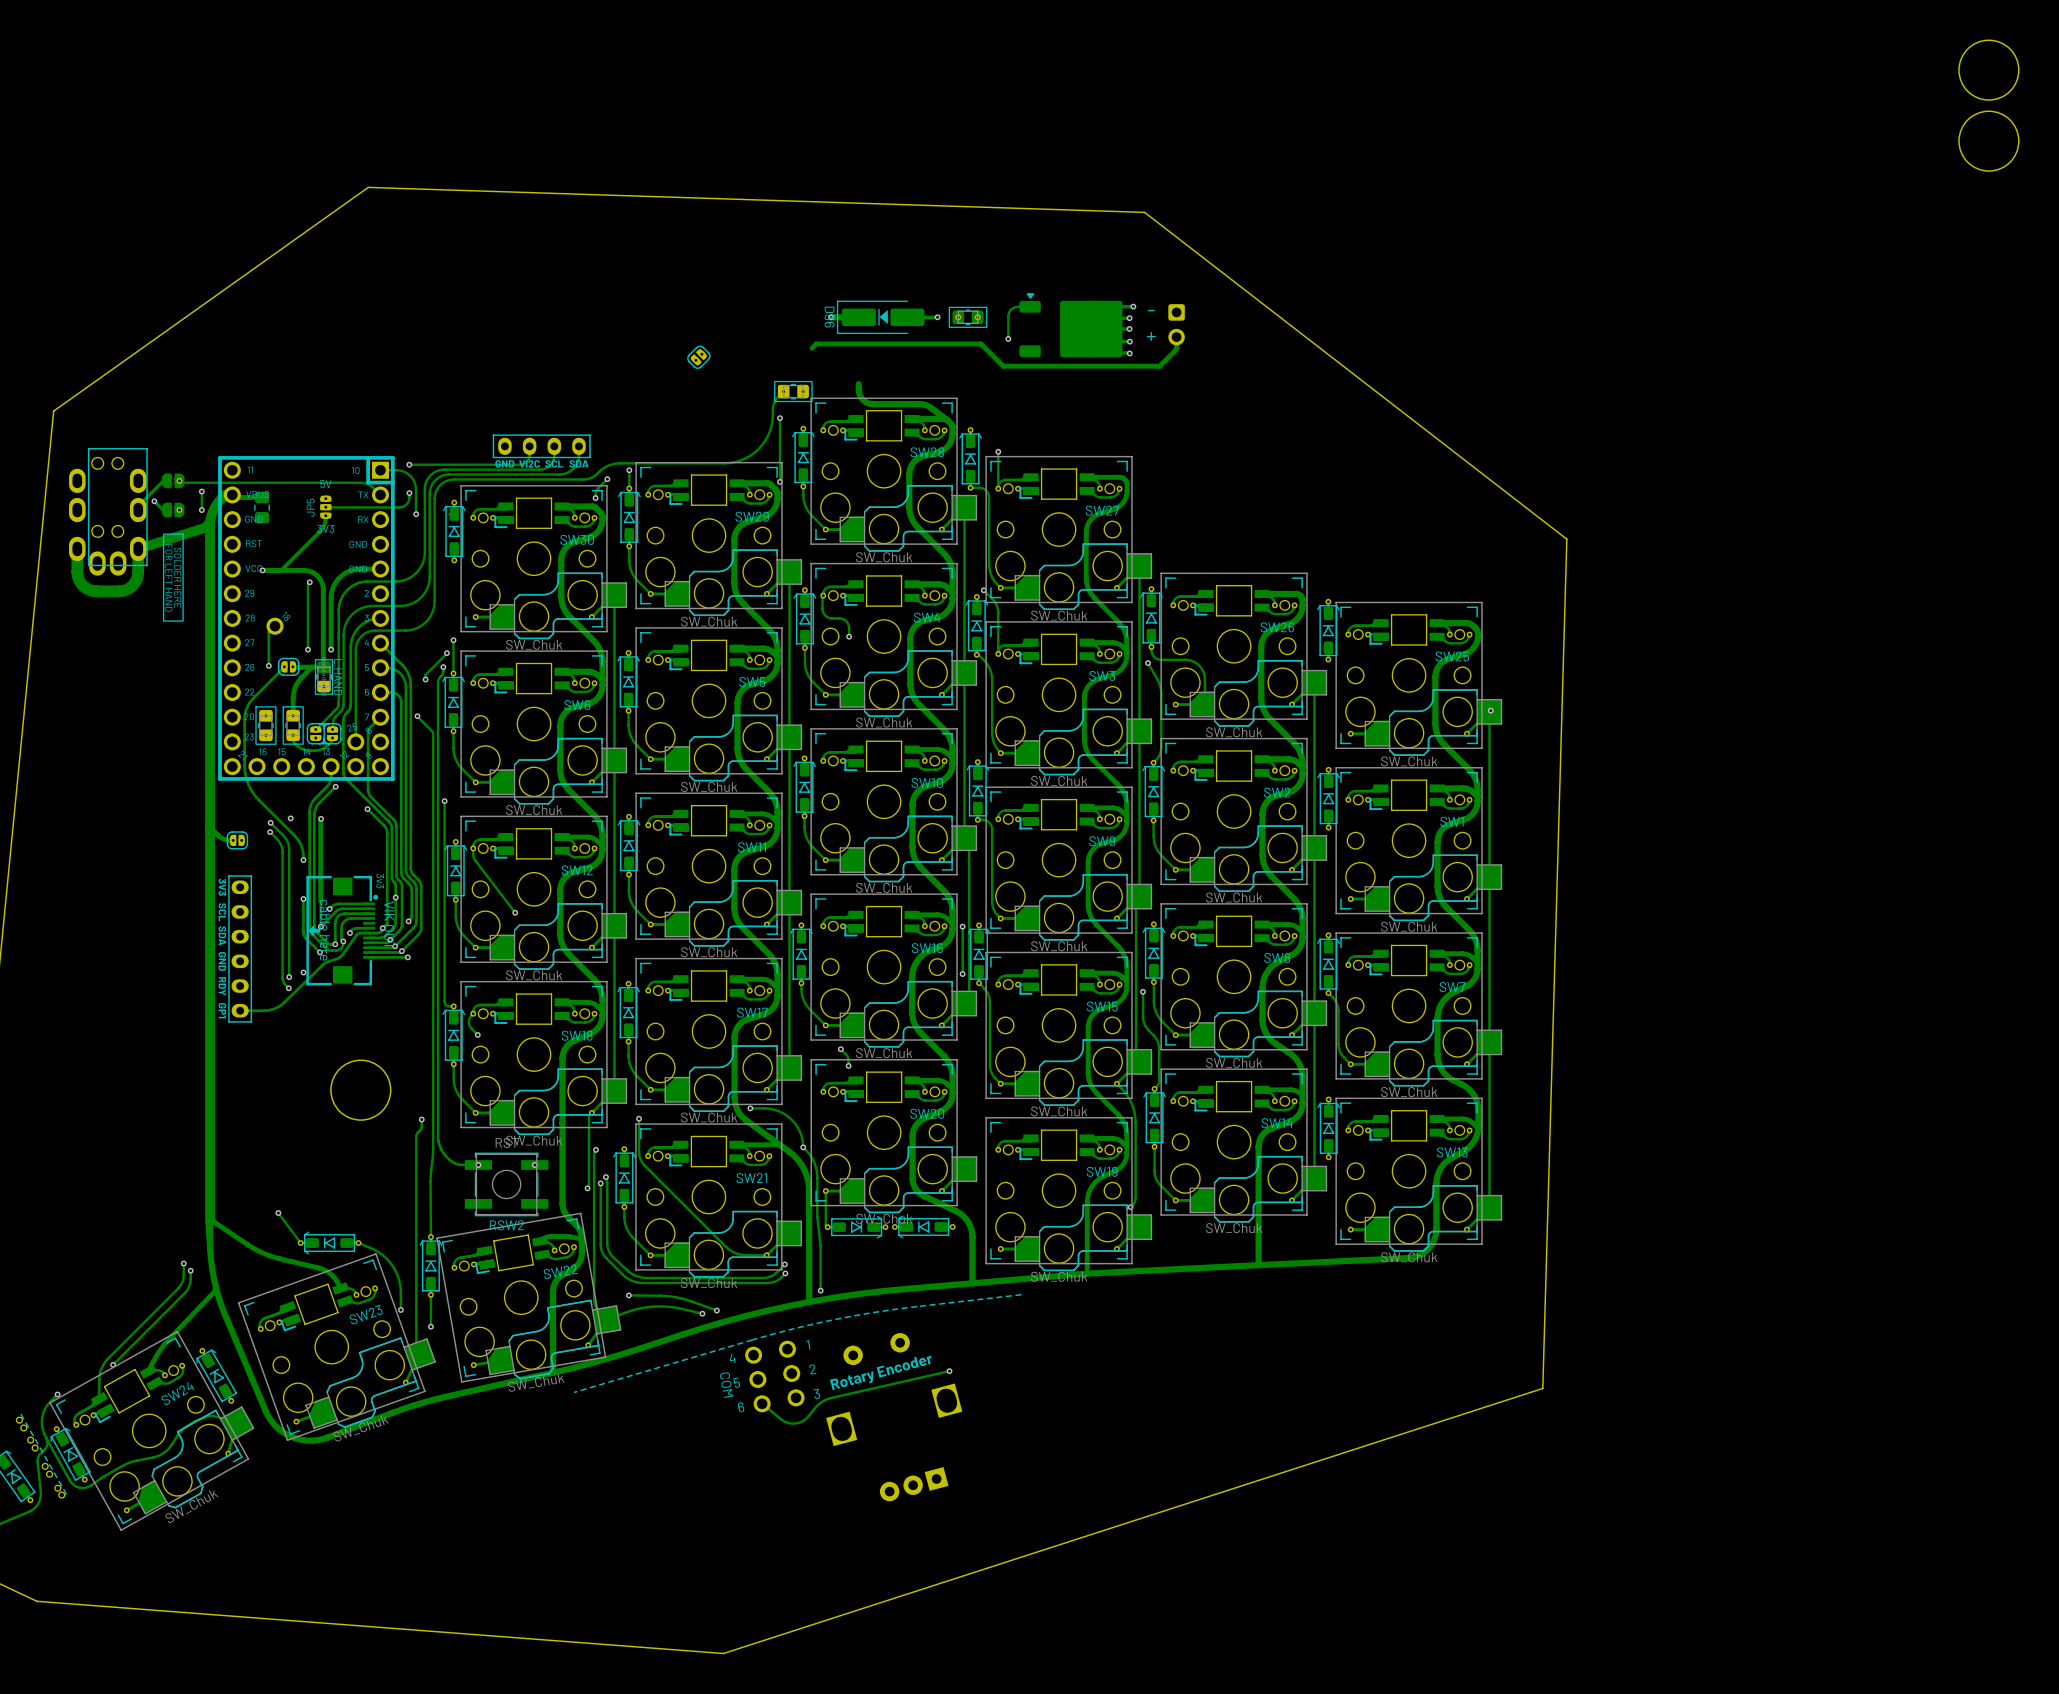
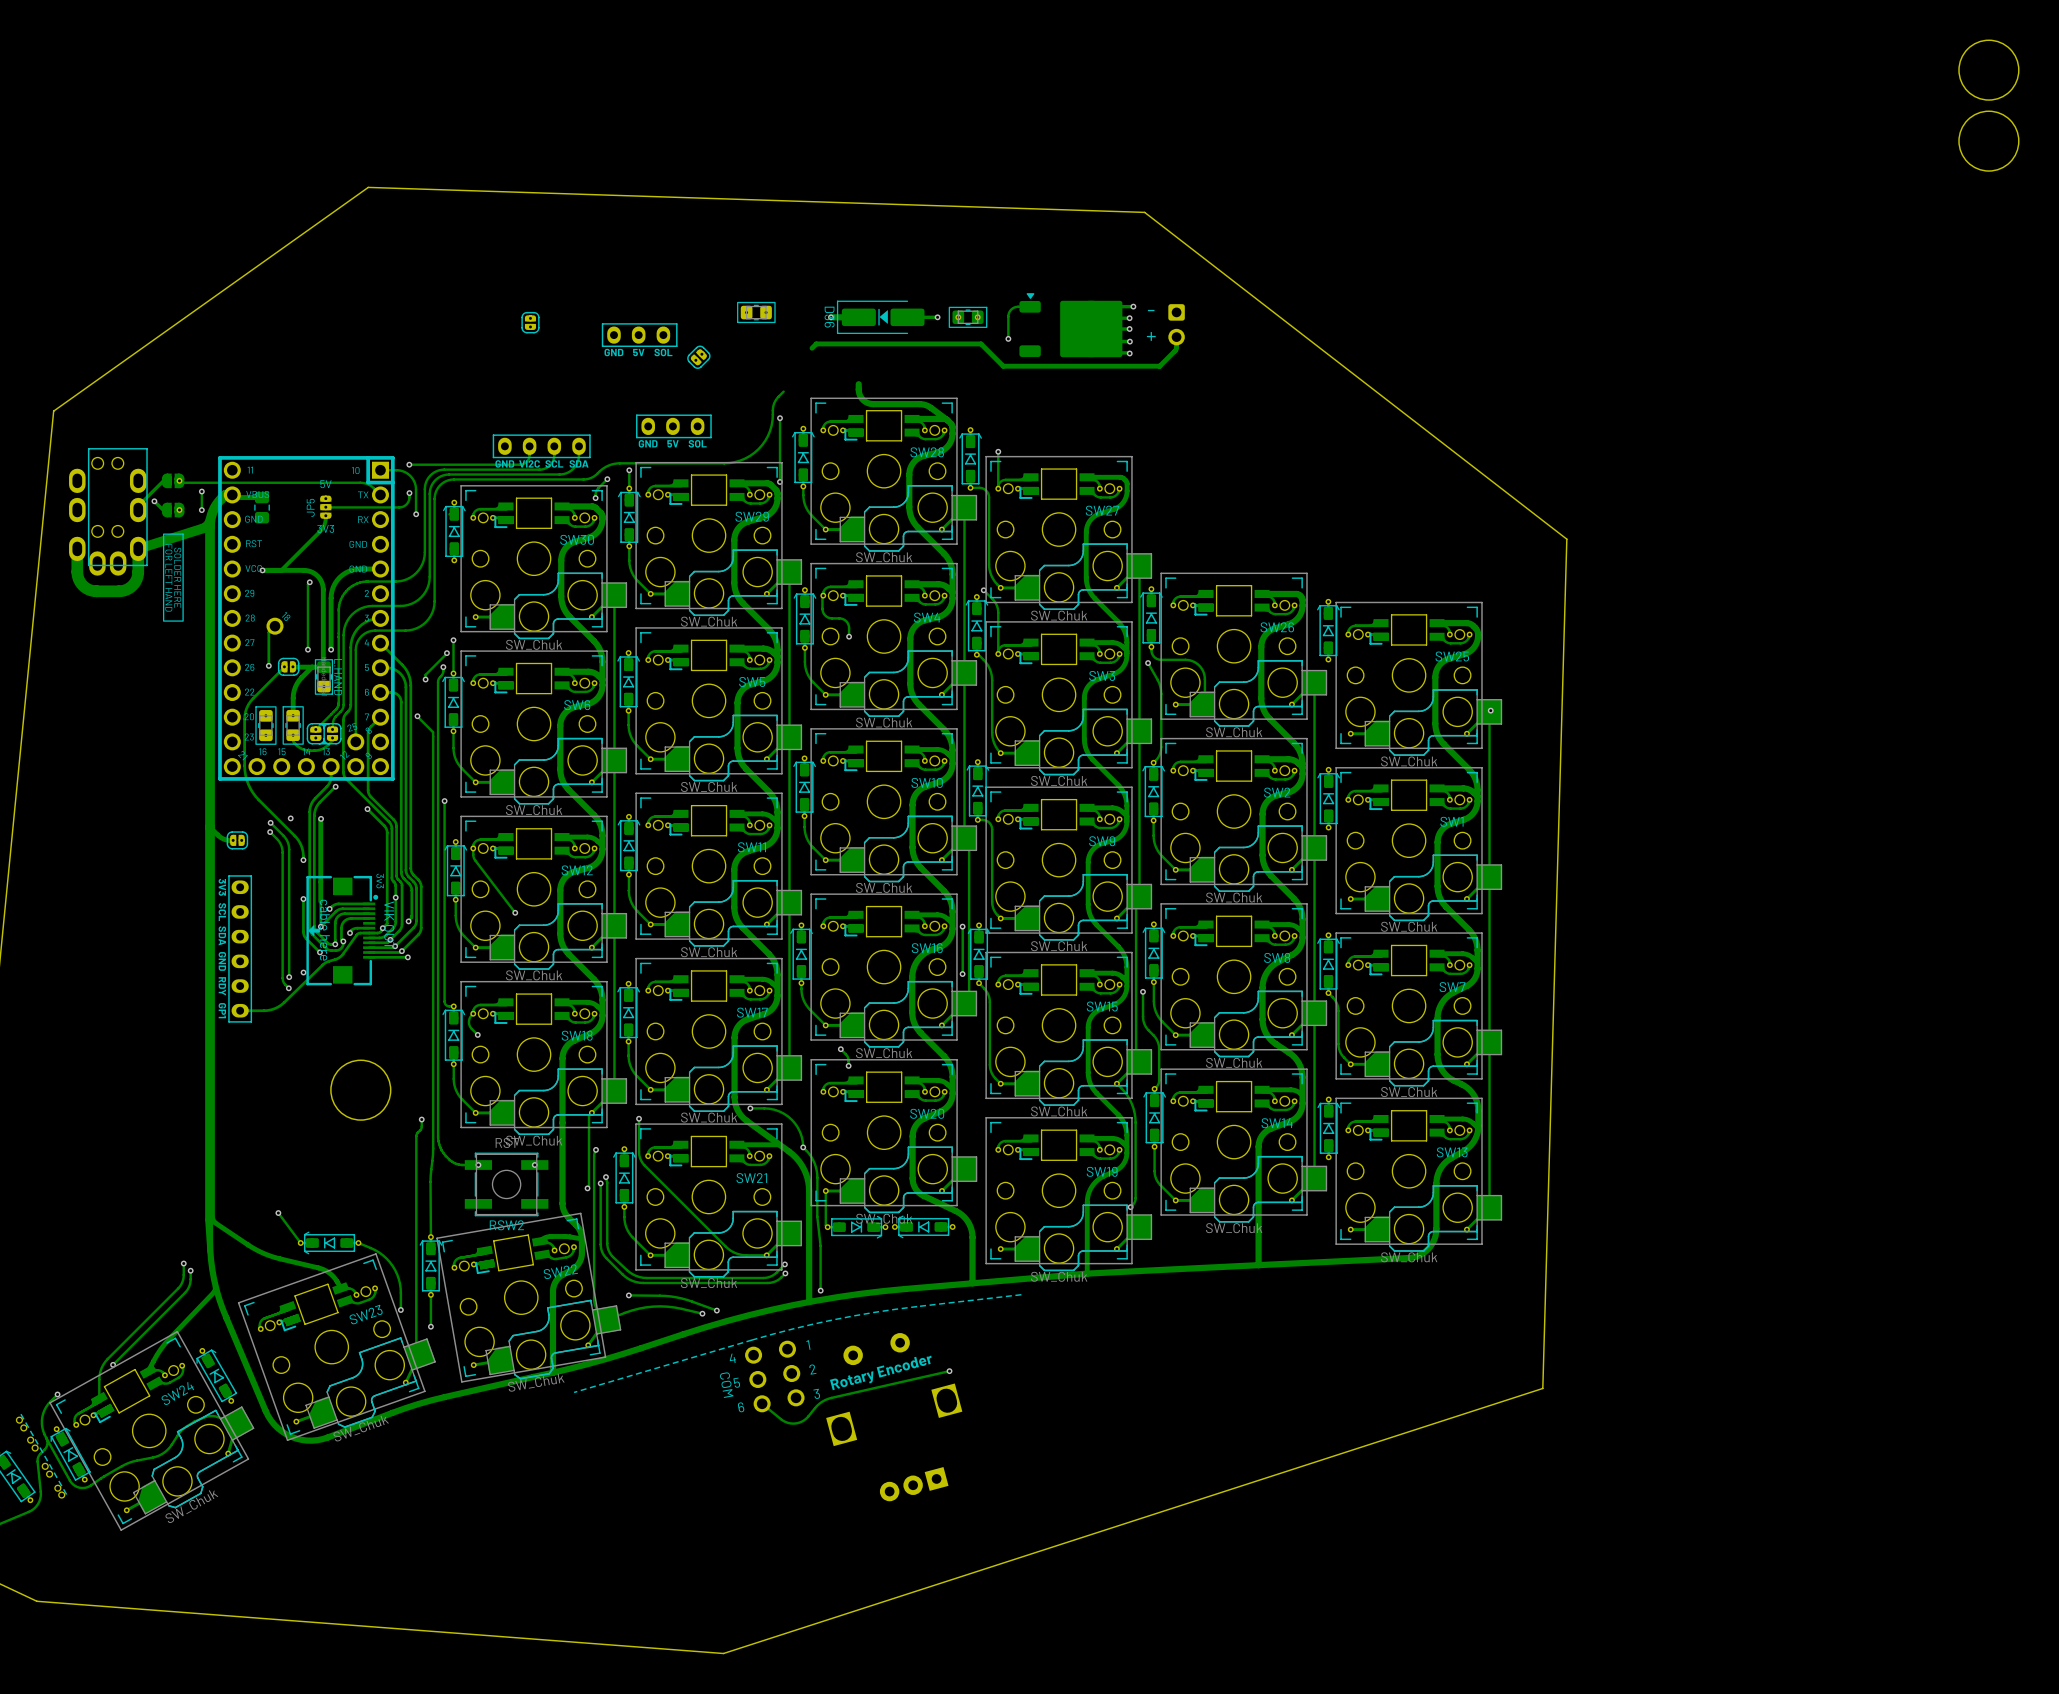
part: none -> (530, 322)
part: none -> (639, 335)
part position: (793, 391) -> (756, 312)
part: none -> (673, 426)

